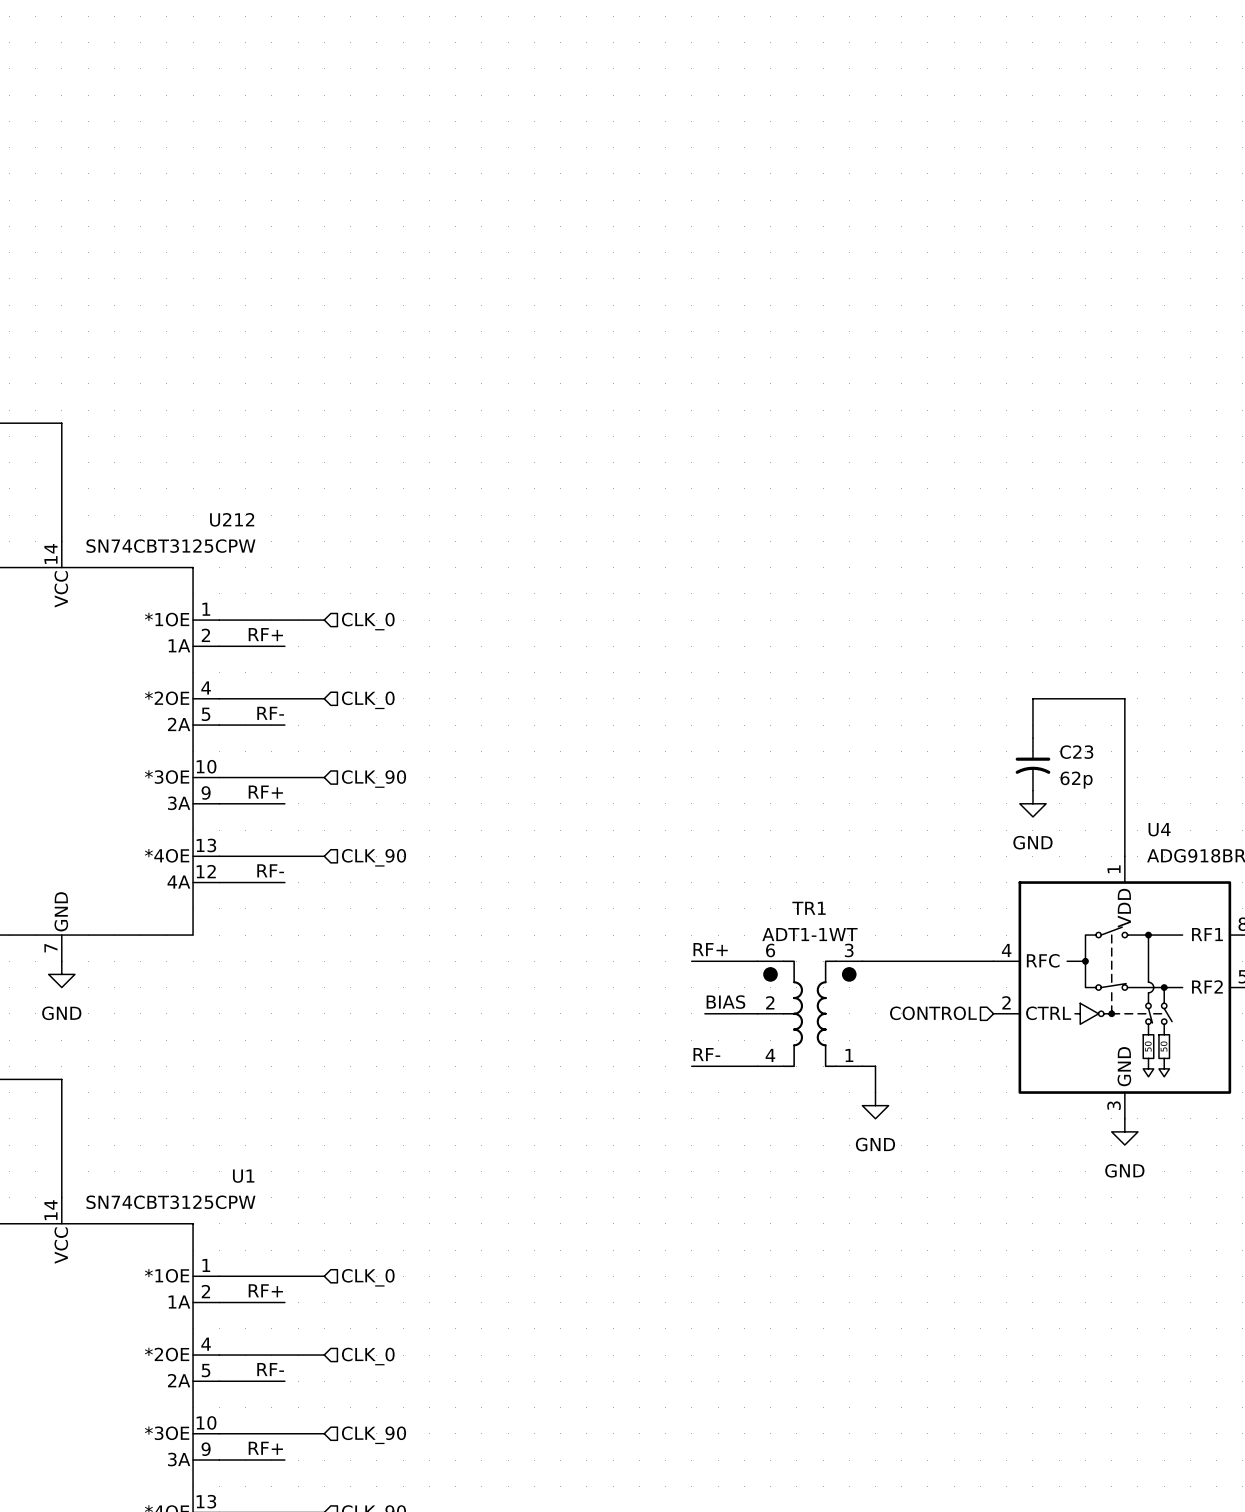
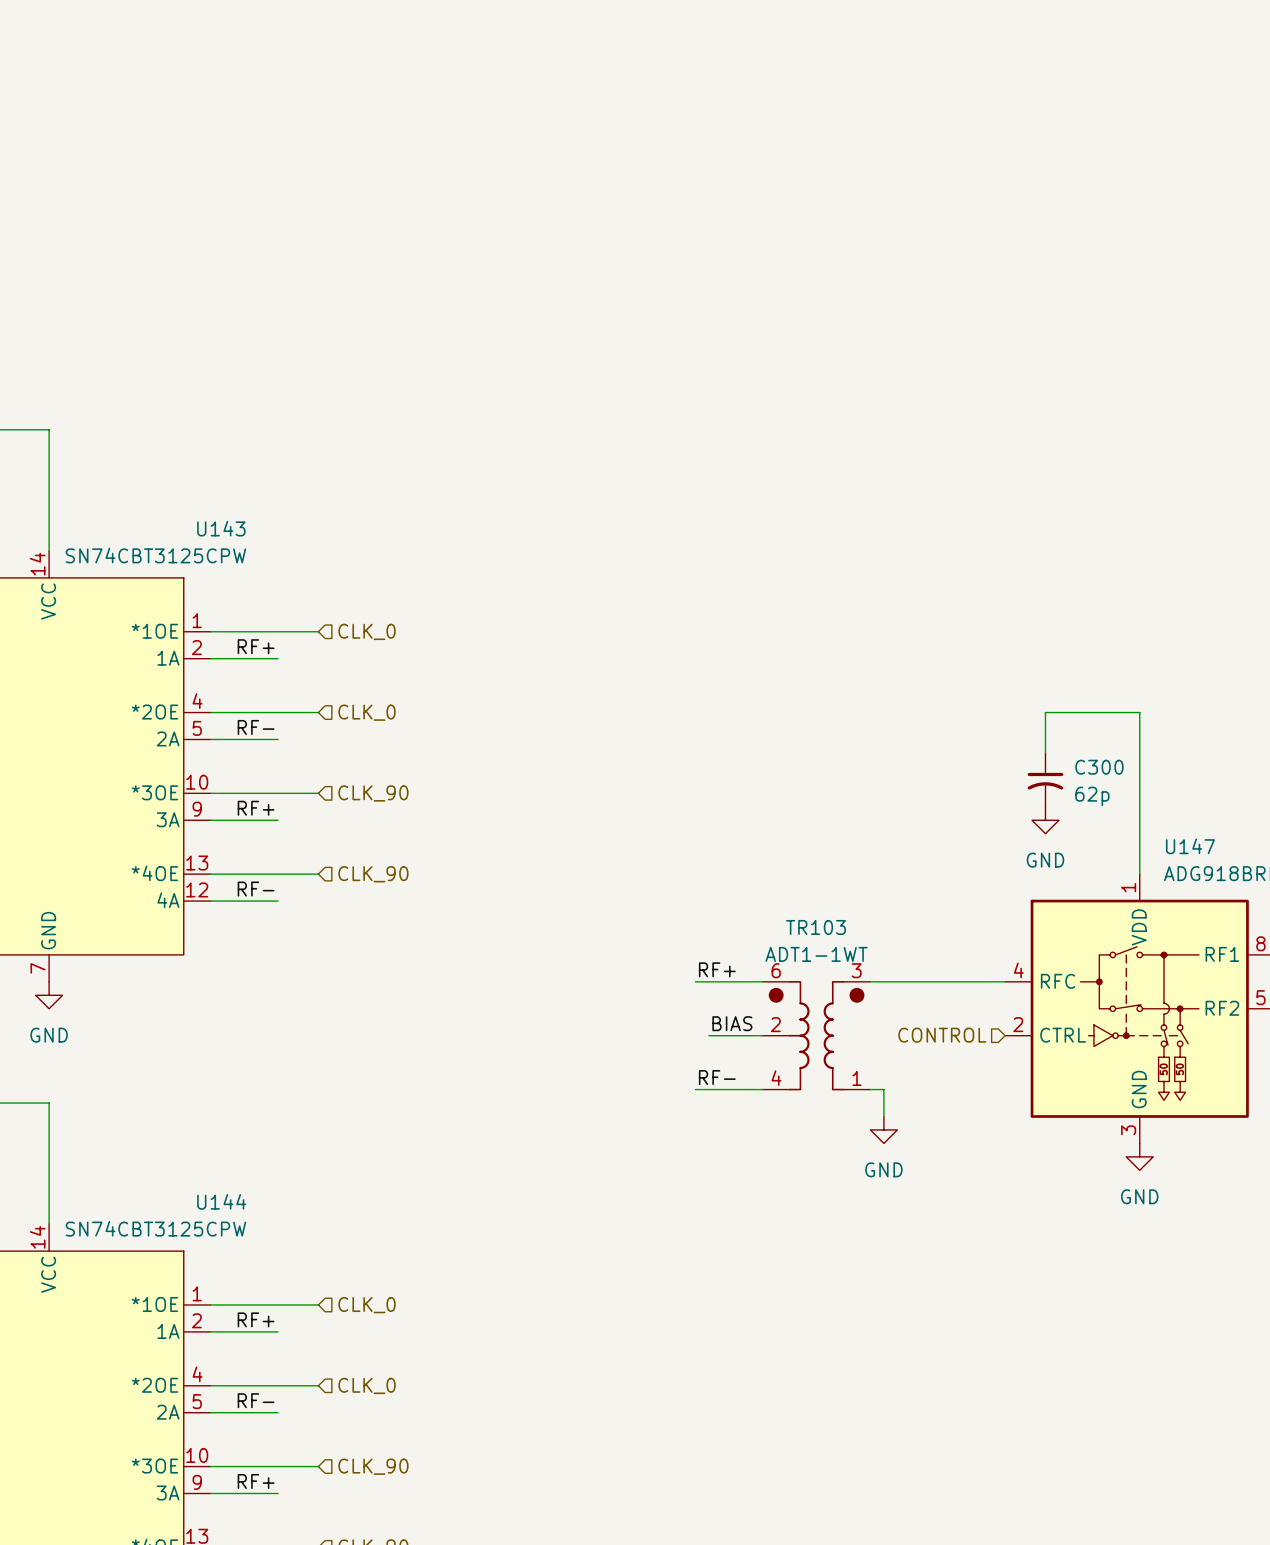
U212 name: U212 (232, 519) -> U143 (221, 528)
C23 name: C23 (1076, 752) -> C300 (1099, 767)
U4 name: U4 (1159, 829) -> U147 (1190, 846)
TR1 name: TR1 (809, 908) -> TR103 (815, 927)
U1 name: U1 (243, 1176) -> U144 (221, 1201)

